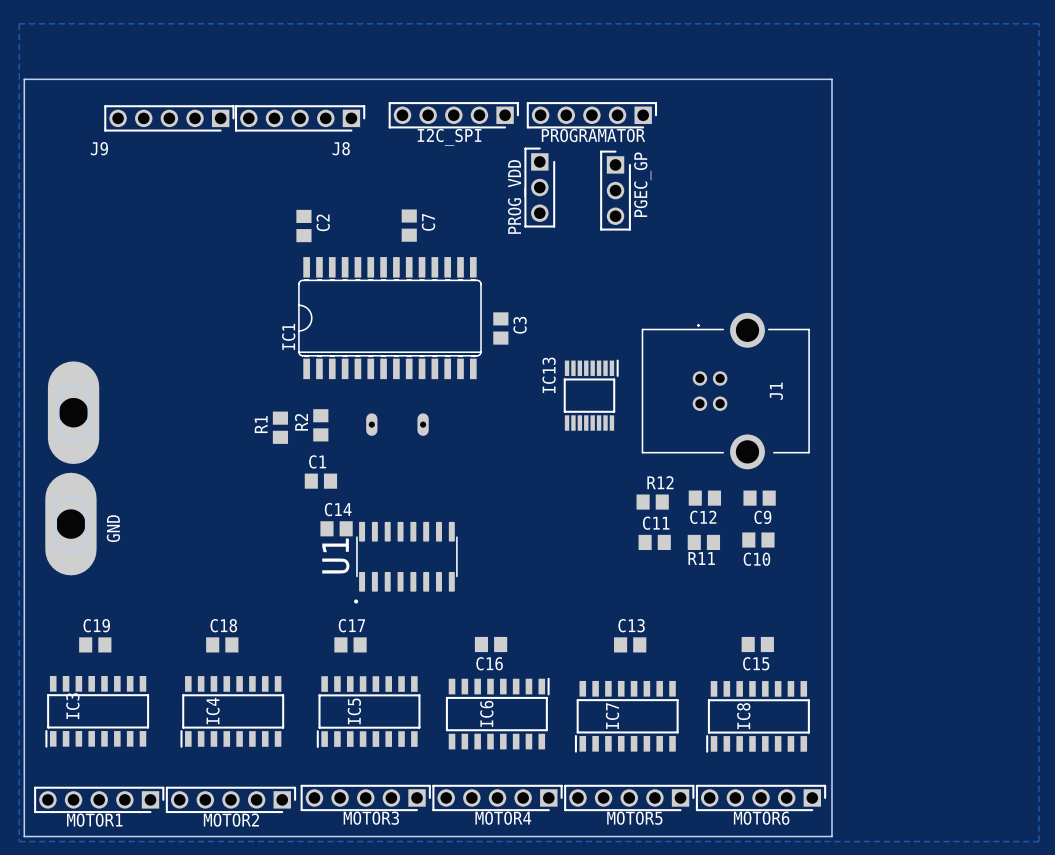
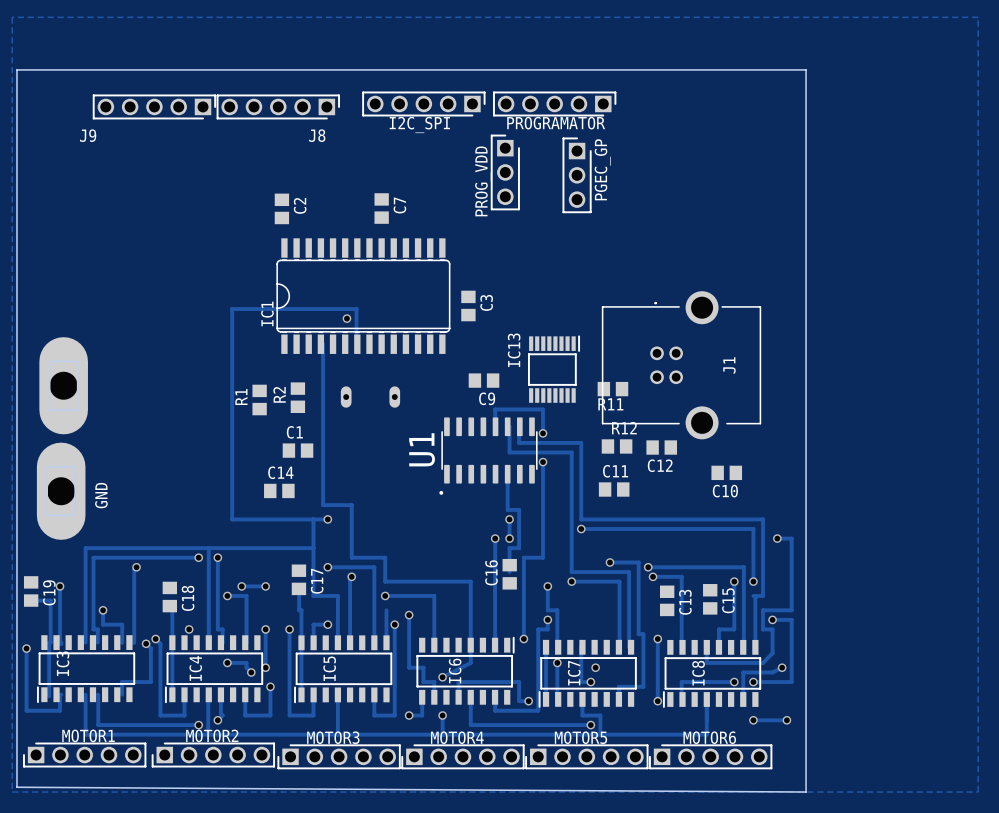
board edge: (831, 79) (831, 836) (24, 836) -> (782, 69) (806, 69) (806, 792) (16, 787)
via: none -> (346, 318)
track: none -> (320, 344) (323, 344) (323, 505) (351, 505) (351, 557) (385, 557) (385, 581) (470, 581) (470, 662) (442, 677)
track: none -> (357, 344) (356, 309) (232, 309) (232, 519) (327, 519)
track: none -> (495, 426) (495, 409) (543, 409) (543, 433)
track: none -> (507, 426) (509, 426) (509, 452) (571, 452) (571, 572) (629, 572) (629, 647) (631, 647)
track: none -> (519, 426) (519, 442) (581, 442) (581, 519) (763, 519) (763, 595) (753, 595)
via: none -> (543, 433)
track: none -> (543, 462) (543, 557) (523, 557) (523, 639)
via: none -> (543, 462)
C12 position: (704, 498) -> (661, 447)
C9 position: (759, 498) -> (484, 380)
R12 position: (652, 502) -> (617, 446)
track: none -> (507, 474) (507, 509) (519, 509) (519, 548) (509, 548) (509, 572)
C14 position: (336, 528) -> (279, 490)
C10 position: (758, 540) -> (726, 472)
C11 position: (654, 542) -> (614, 489)
R11 position: (703, 542) -> (612, 389)
track: none -> (313, 519) (313, 595) (337, 595) (337, 642)
via: none -> (327, 519)
track: none -> (509, 519) (509, 538)
via: none -> (509, 519)
U1 position: (405, 562) -> (488, 456)
track: none -> (581, 529) (753, 529) (753, 581)
via: none -> (581, 529)
track: none -> (495, 538) (495, 645)
via: none -> (495, 538)
via: none -> (509, 538)
track: none -> (777, 538) (791, 538) (791, 610) (763, 610) (763, 629) (772, 629) (772, 653) (763, 662) (706, 662) (706, 647)
via: none -> (777, 538)
track: none -> (208, 548) (208, 642)
track: none -> (313, 548) (85, 548) (85, 642)
track: none -> (198, 557) (93, 557) (93, 629) (97, 629) (97, 642)
via: none -> (198, 557)
track: none -> (217, 557) (217, 629) (222, 629) (222, 642) (220, 642)
via: none -> (217, 557)
track: none -> (609, 562) (638, 562) (638, 634) (643, 634) (643, 686) (618, 686) (618, 699)
via: none -> (609, 562)
track: none -> (136, 567) (134, 569) (134, 642) (131, 642)
via: none -> (136, 567)
track: none -> (327, 567) (374, 567) (374, 642)
via: none -> (327, 567)
track: none -> (648, 567) (743, 567) (743, 647)
via: none -> (648, 567)
track: none -> (351, 576) (350, 576) (350, 642)
via: none -> (351, 576)
track: none -> (653, 576) (681, 576) (682, 647)
via: none -> (653, 576)
track: none -> (571, 581) (619, 581) (618, 647)
via: none -> (571, 581)
track: none -> (734, 581) (734, 629) (718, 629) (719, 648)
via: none -> (734, 581)
via: none -> (753, 581)
track: none -> (60, 586) (60, 643) (61, 642)
via: none -> (60, 586)
track: none -> (241, 586) (265, 586)
via: none -> (241, 586)
via: none -> (265, 586)
track: none -> (547, 586) (547, 610) (557, 610) (558, 647)
via: none -> (547, 586)
track: none -> (299, 588) (299, 610) (301, 610) (301, 694)
track: none -> (227, 595) (246, 595) (245, 642)
via: none -> (227, 595)
track: none -> (385, 595) (434, 595) (434, 645)
via: none -> (385, 595)
track: none -> (755, 595) (755, 647)
track: none -> (31, 600) (50, 600) (49, 696)
C19 rotation: 0° (95, 644) -> 90° clockwise (31, 591)
C19 position: (95, 644) -> (31, 591)
C18 rotation: 0° (222, 644) -> 90° clockwise (169, 597)
C18 position: (222, 644) -> (169, 597)
C17 rotation: 0° (350, 644) -> 90° clockwise (298, 579)
C17 position: (350, 644) -> (298, 579)
C16 rotation: 0° (491, 644) -> 90° clockwise (509, 574)
C16 position: (491, 644) -> (509, 574)
C13 rotation: 0° (630, 644) -> 90° clockwise (667, 600)
C13 position: (630, 644) -> (667, 600)
C15 rotation: 0° (757, 644) -> 90° clockwise (710, 599)
track: none -> (169, 606) (172, 606) (172, 694)
track: none -> (103, 610) (103, 624) (122, 624) (122, 642)
via: none -> (103, 610)
track: none -> (386, 610) (386, 642)
track: none -> (409, 615) (409, 667) (423, 667) (423, 682) (434, 682) (434, 697)
via: none -> (409, 615)
track: none -> (547, 619) (547, 629) (538, 629) (538, 710) (495, 710) (495, 697)
via: none -> (547, 619)
track: none -> (772, 619) (791, 619) (791, 682) (753, 682)
via: none -> (772, 619)
C15 name position: C15 (756, 663) -> C15 (728, 600)
track: none -> (313, 624) (327, 624)
track: none -> (313, 624) (313, 642)
via: none -> (327, 624)
track: none -> (394, 624) (394, 715) (374, 715) (374, 694)
via: none -> (394, 624)
via: none -> (189, 629)
track: none -> (265, 629) (265, 667)
via: none -> (265, 629)
track: none -> (289, 629) (289, 715) (313, 715) (313, 694)
via: none -> (289, 629)
track: none -> (155, 639) (160, 643) (160, 715) (184, 715) (184, 694)
via: none -> (155, 639)
via: none -> (523, 639)
track: none -> (657, 639) (657, 701)
via: none -> (657, 639)
track: none -> (146, 643) (150, 648) (150, 682) (122, 682) (122, 694)
via: none -> (146, 643)
track: none -> (546, 647) (546, 699)
track: none -> (582, 647) (581, 682) (590, 682)
track: none -> (26, 648) (26, 710) (60, 710) (61, 694)
via: none -> (26, 648)
track: none -> (227, 662) (246, 662) (246, 667) (251, 672)
via: none -> (227, 662)
track: none -> (557, 662) (558, 699)
via: none -> (557, 662)
via: none -> (265, 667)
via: none -> (595, 667)
track: none -> (782, 667) (772, 672) (743, 672) (743, 699)
via: none -> (782, 667)
via: none -> (251, 672)
via: none -> (442, 677)
via: none -> (590, 682)
track: none -> (734, 682) (681, 682) (682, 699)
via: none -> (734, 682)
via: none -> (753, 682)
track: none -> (270, 686) (270, 715) (245, 715) (245, 694)
via: none -> (270, 686)
track: none -> (85, 694) (85, 734) (706, 734) (706, 699)
track: none -> (97, 694) (98, 725) (198, 725)
track: none -> (208, 694) (208, 734)
track: none -> (220, 694) (220, 713) (222, 715) (217, 720)
track: none -> (337, 694) (337, 734)
track: none -> (422, 697) (422, 715) (409, 715)
track: none -> (458, 697) (458, 682) (519, 682) (519, 701) (528, 701)
track: none -> (470, 697) (470, 725) (590, 725)
track: none -> (582, 699) (582, 715) (600, 715) (600, 734)
via: none -> (528, 701)
via: none -> (657, 701)
via: none -> (409, 715)
track: none -> (442, 715) (442, 734)
via: none -> (442, 715)
via: none -> (217, 720)
track: none -> (753, 720) (786, 720)
via: none -> (753, 720)
via: none -> (786, 720)
via: none -> (198, 725)
via: none -> (590, 725)
MOTOR3 rotation: 0° (365, 797) -> 180° (339, 756)
MOTOR4 rotation: 0° (497, 797) -> 180° (462, 756)
MOTOR5 rotation: 0° (629, 797) -> 180° (586, 756)
MOTOR6 rotation: 0° (761, 797) -> 180° (710, 756)
MOTOR1 rotation: 0° (99, 799) -> 180° (84, 755)
MOTOR2 rotation: 0° (230, 799) -> 180° (213, 755)

